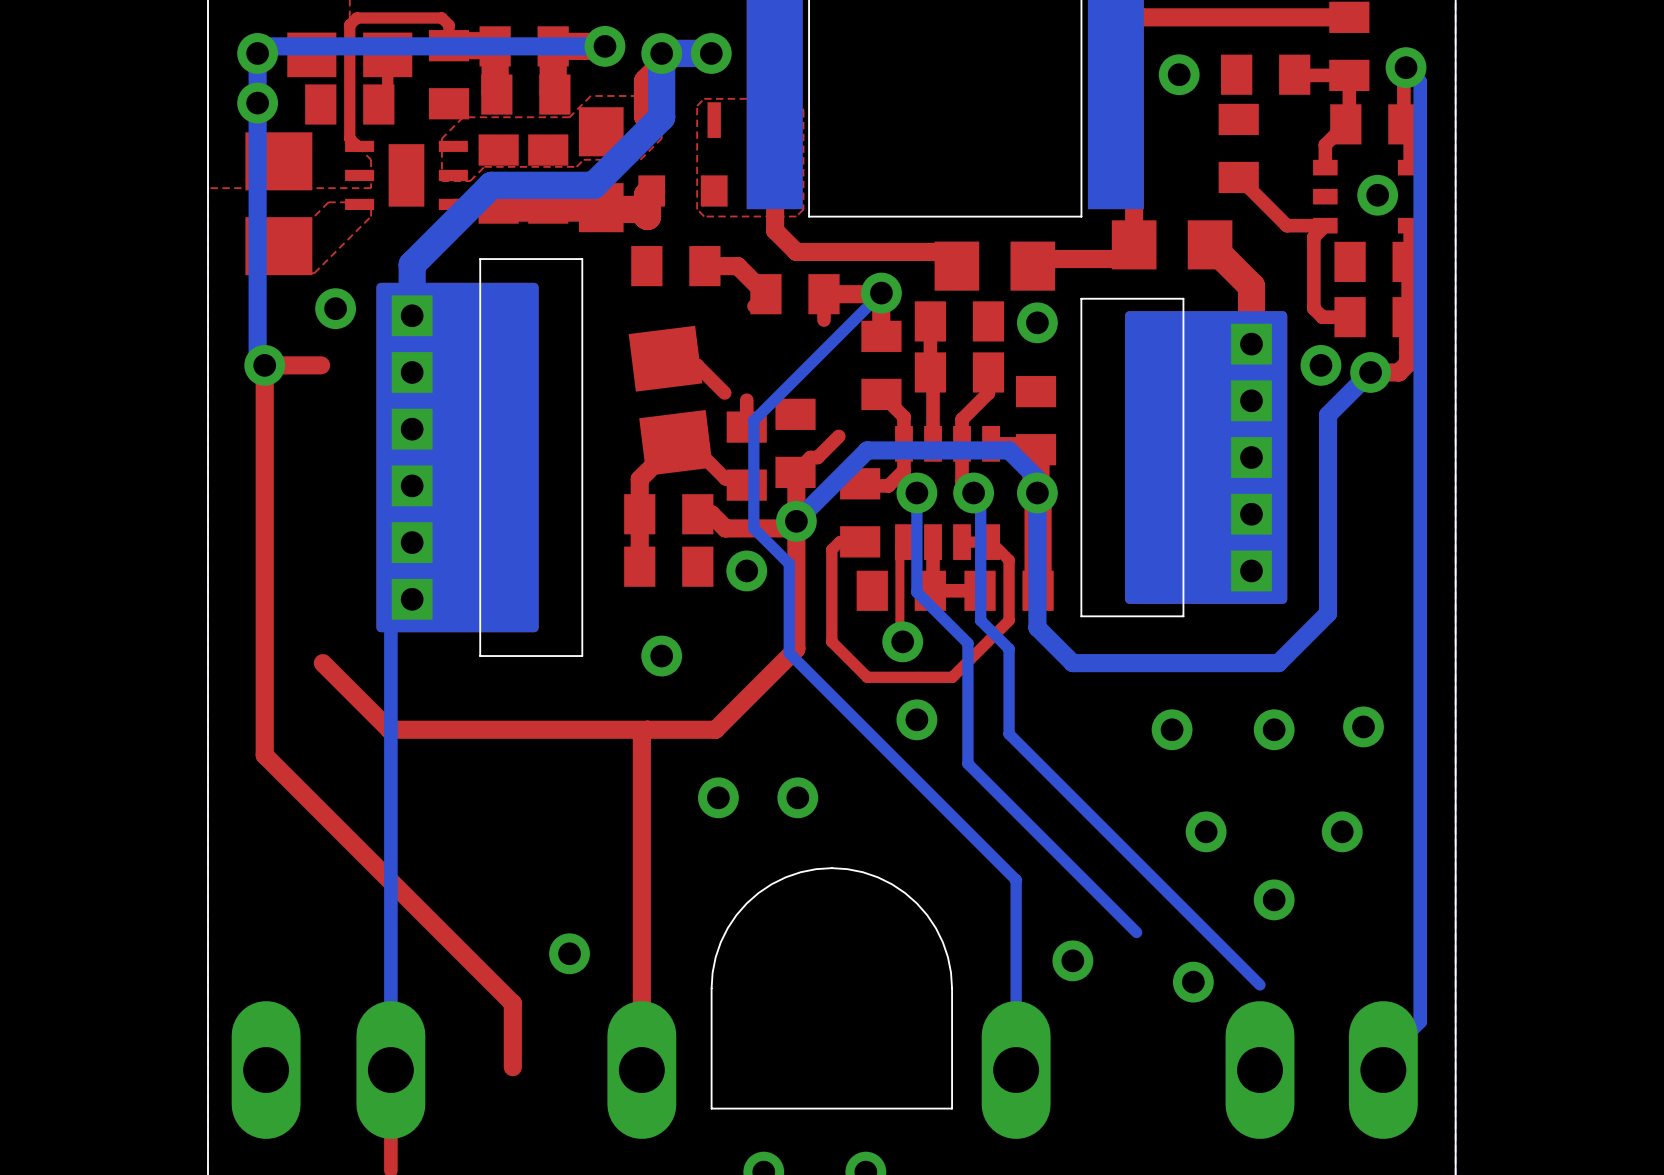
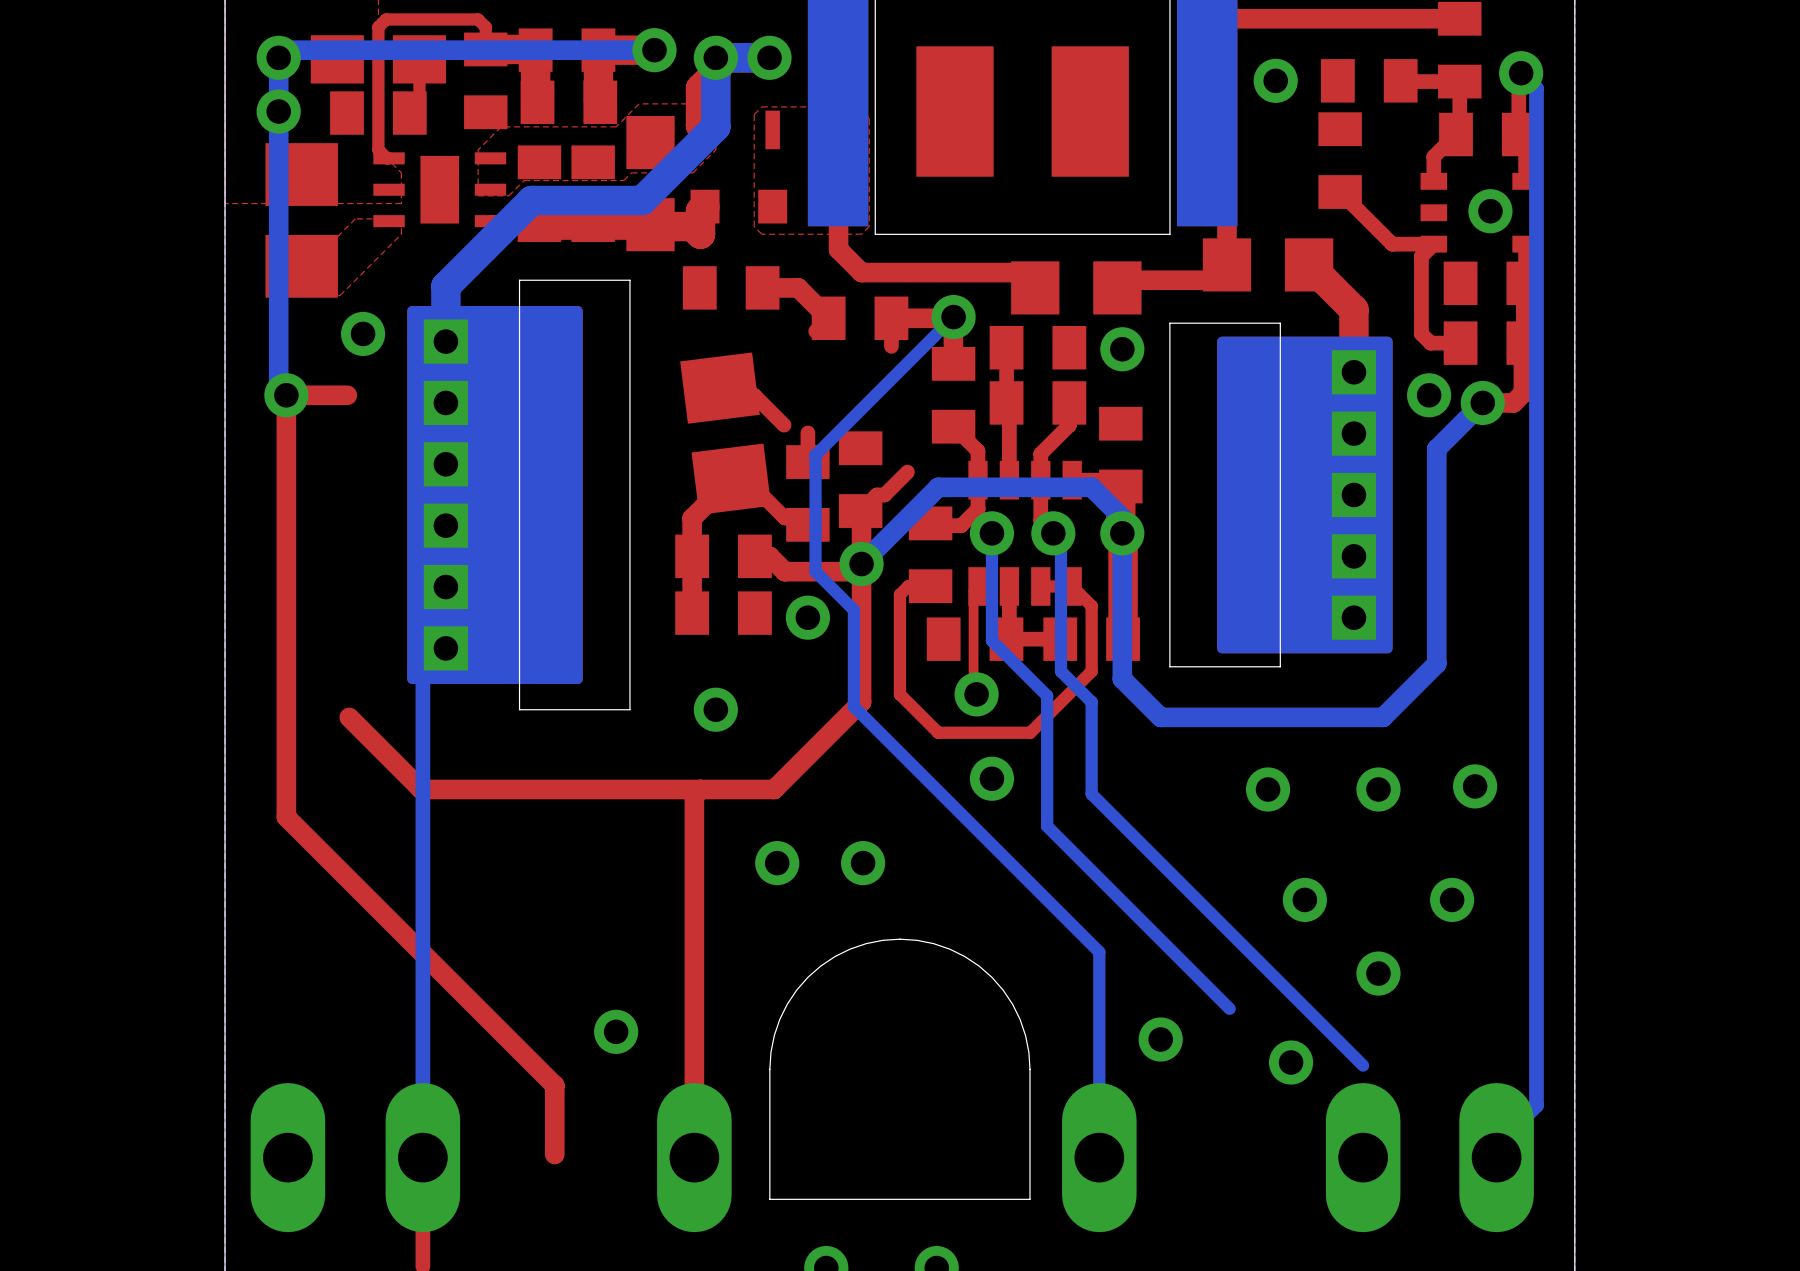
part: none -> (1022, 111)

